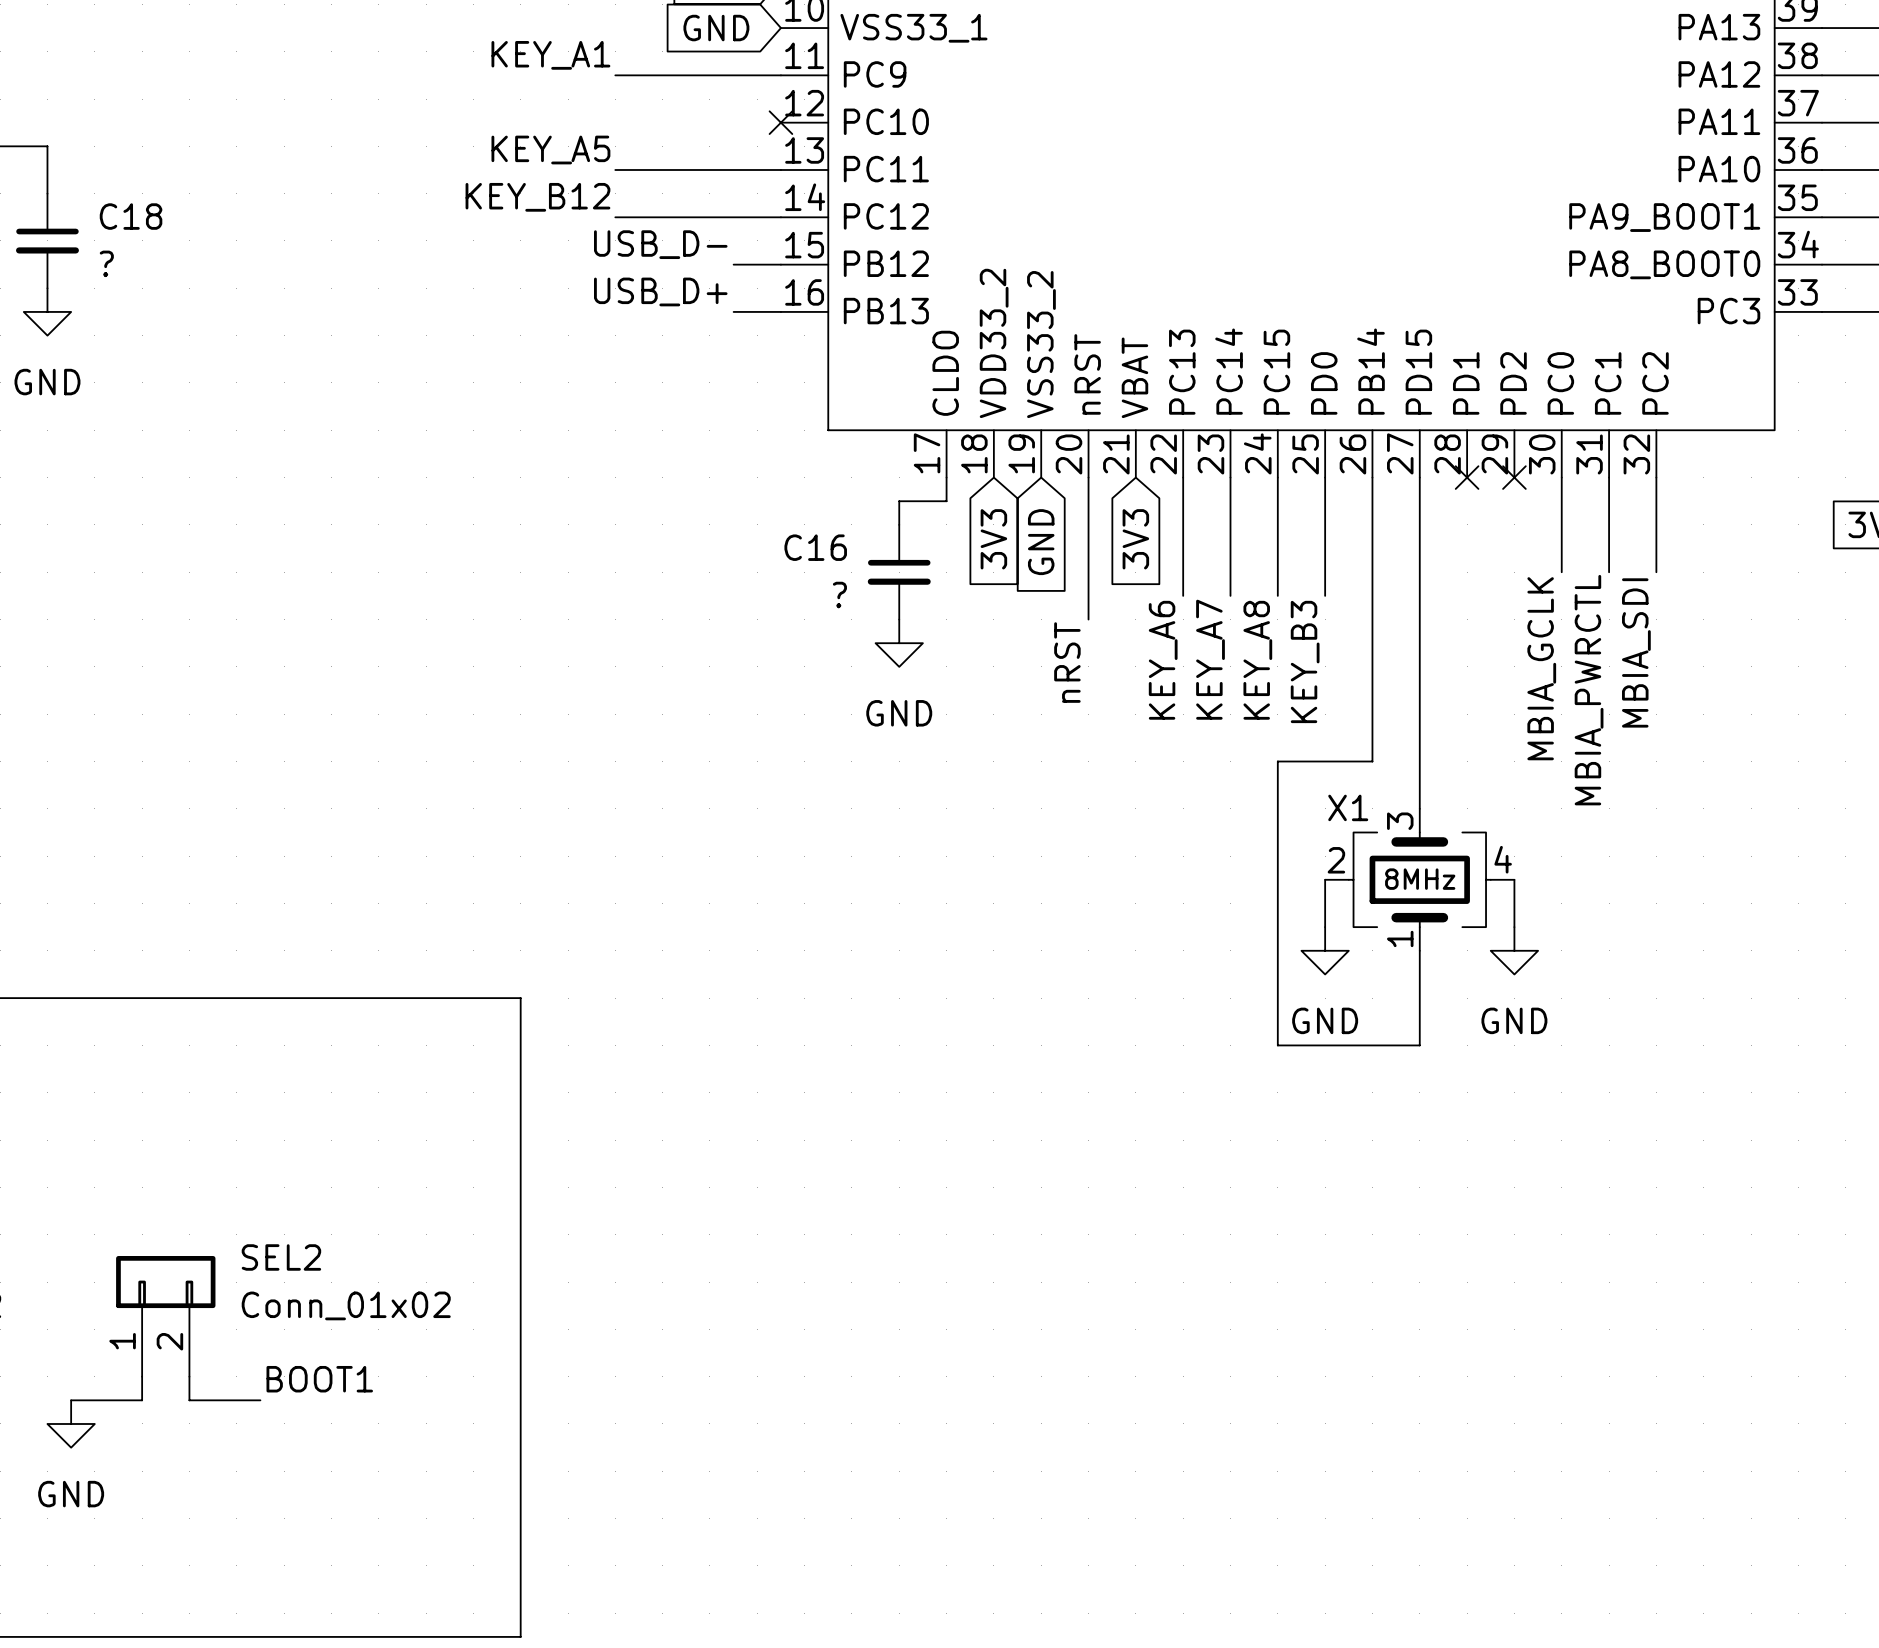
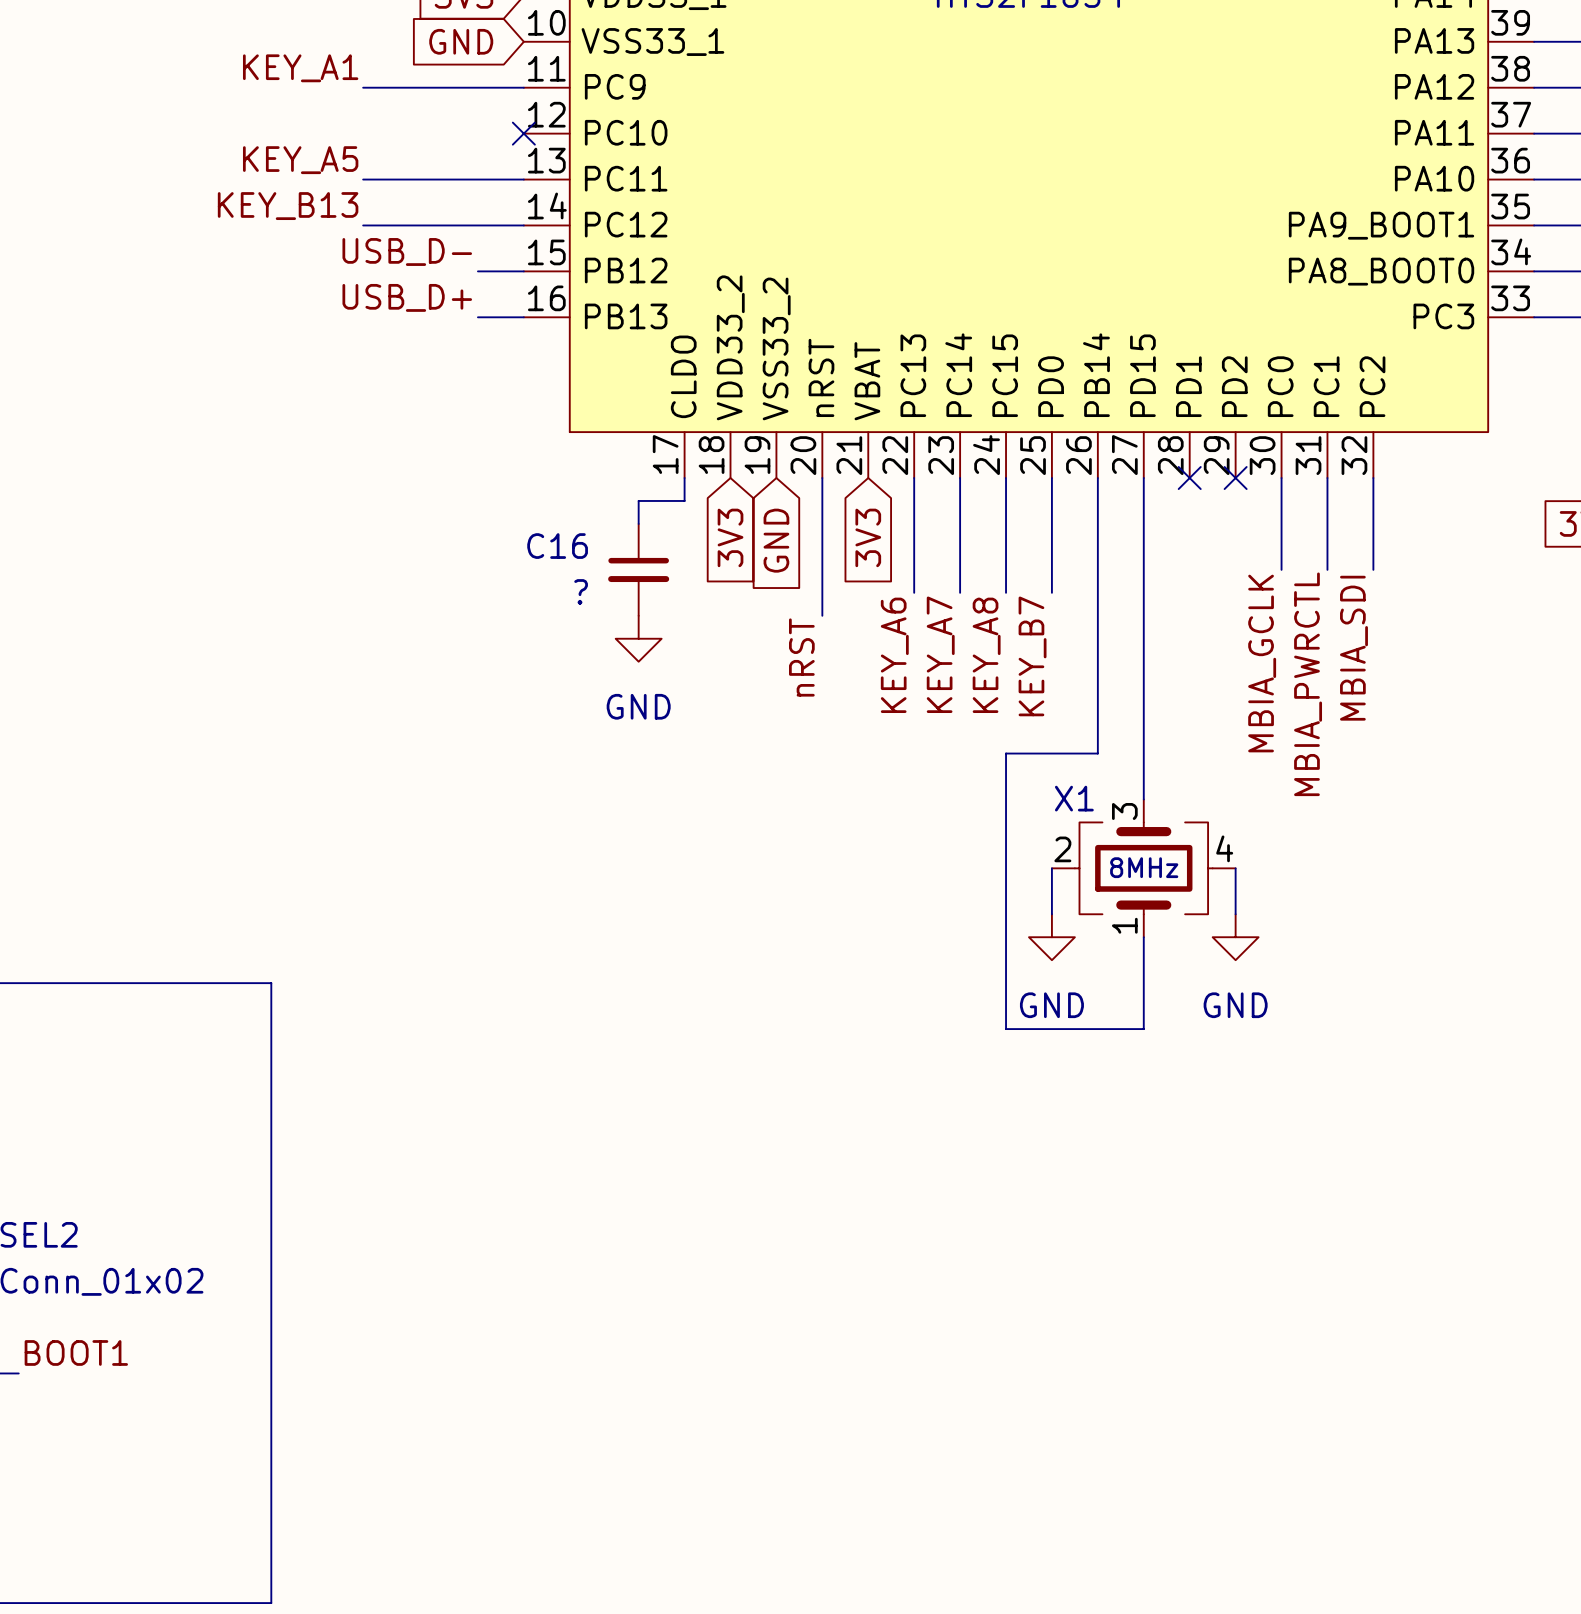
label: KEY_B12 (537, 197) -> KEY_B13 (288, 206)
label: KEY_B3 (1305, 661) -> KEY_B7 (1032, 656)

